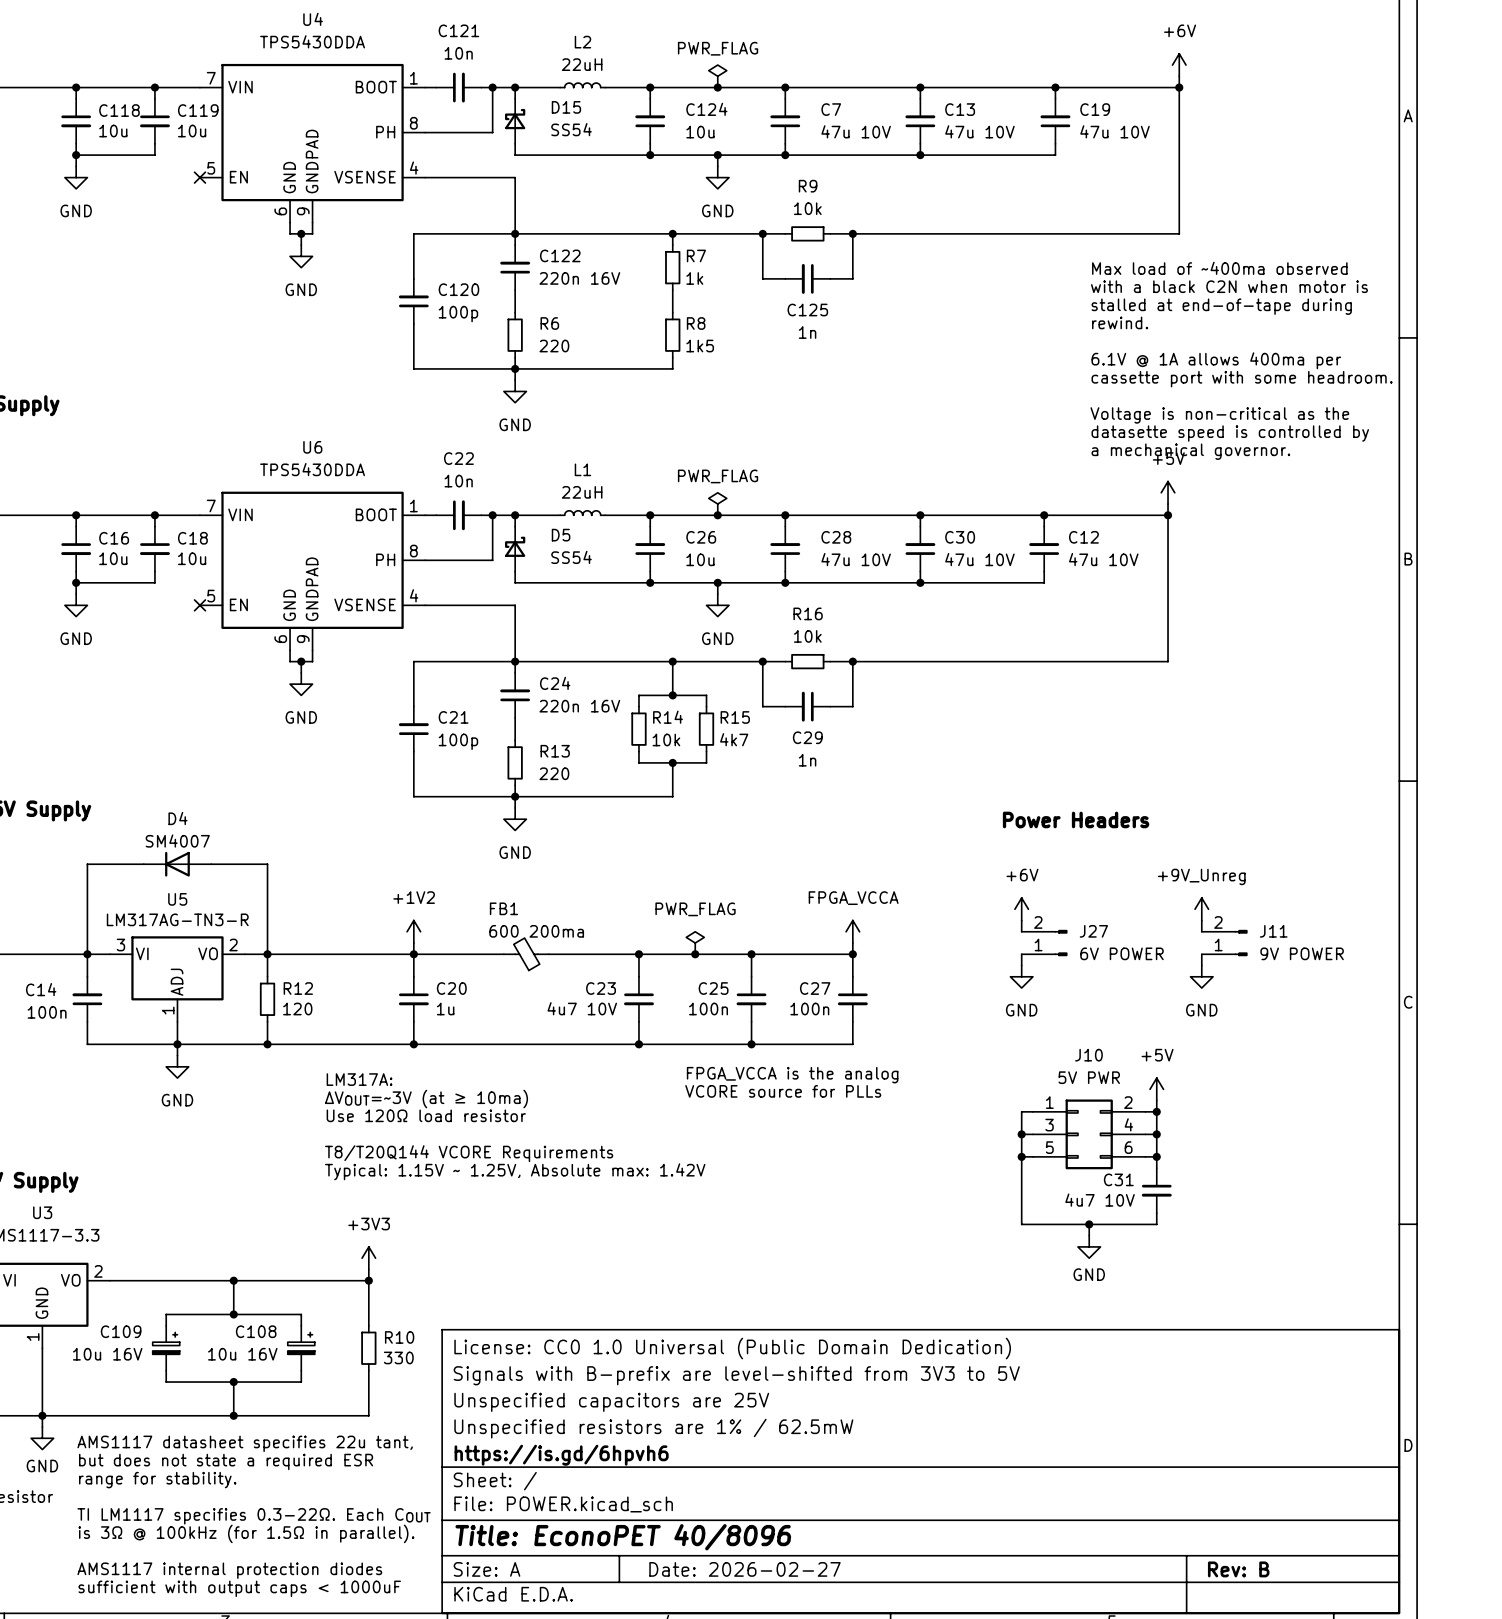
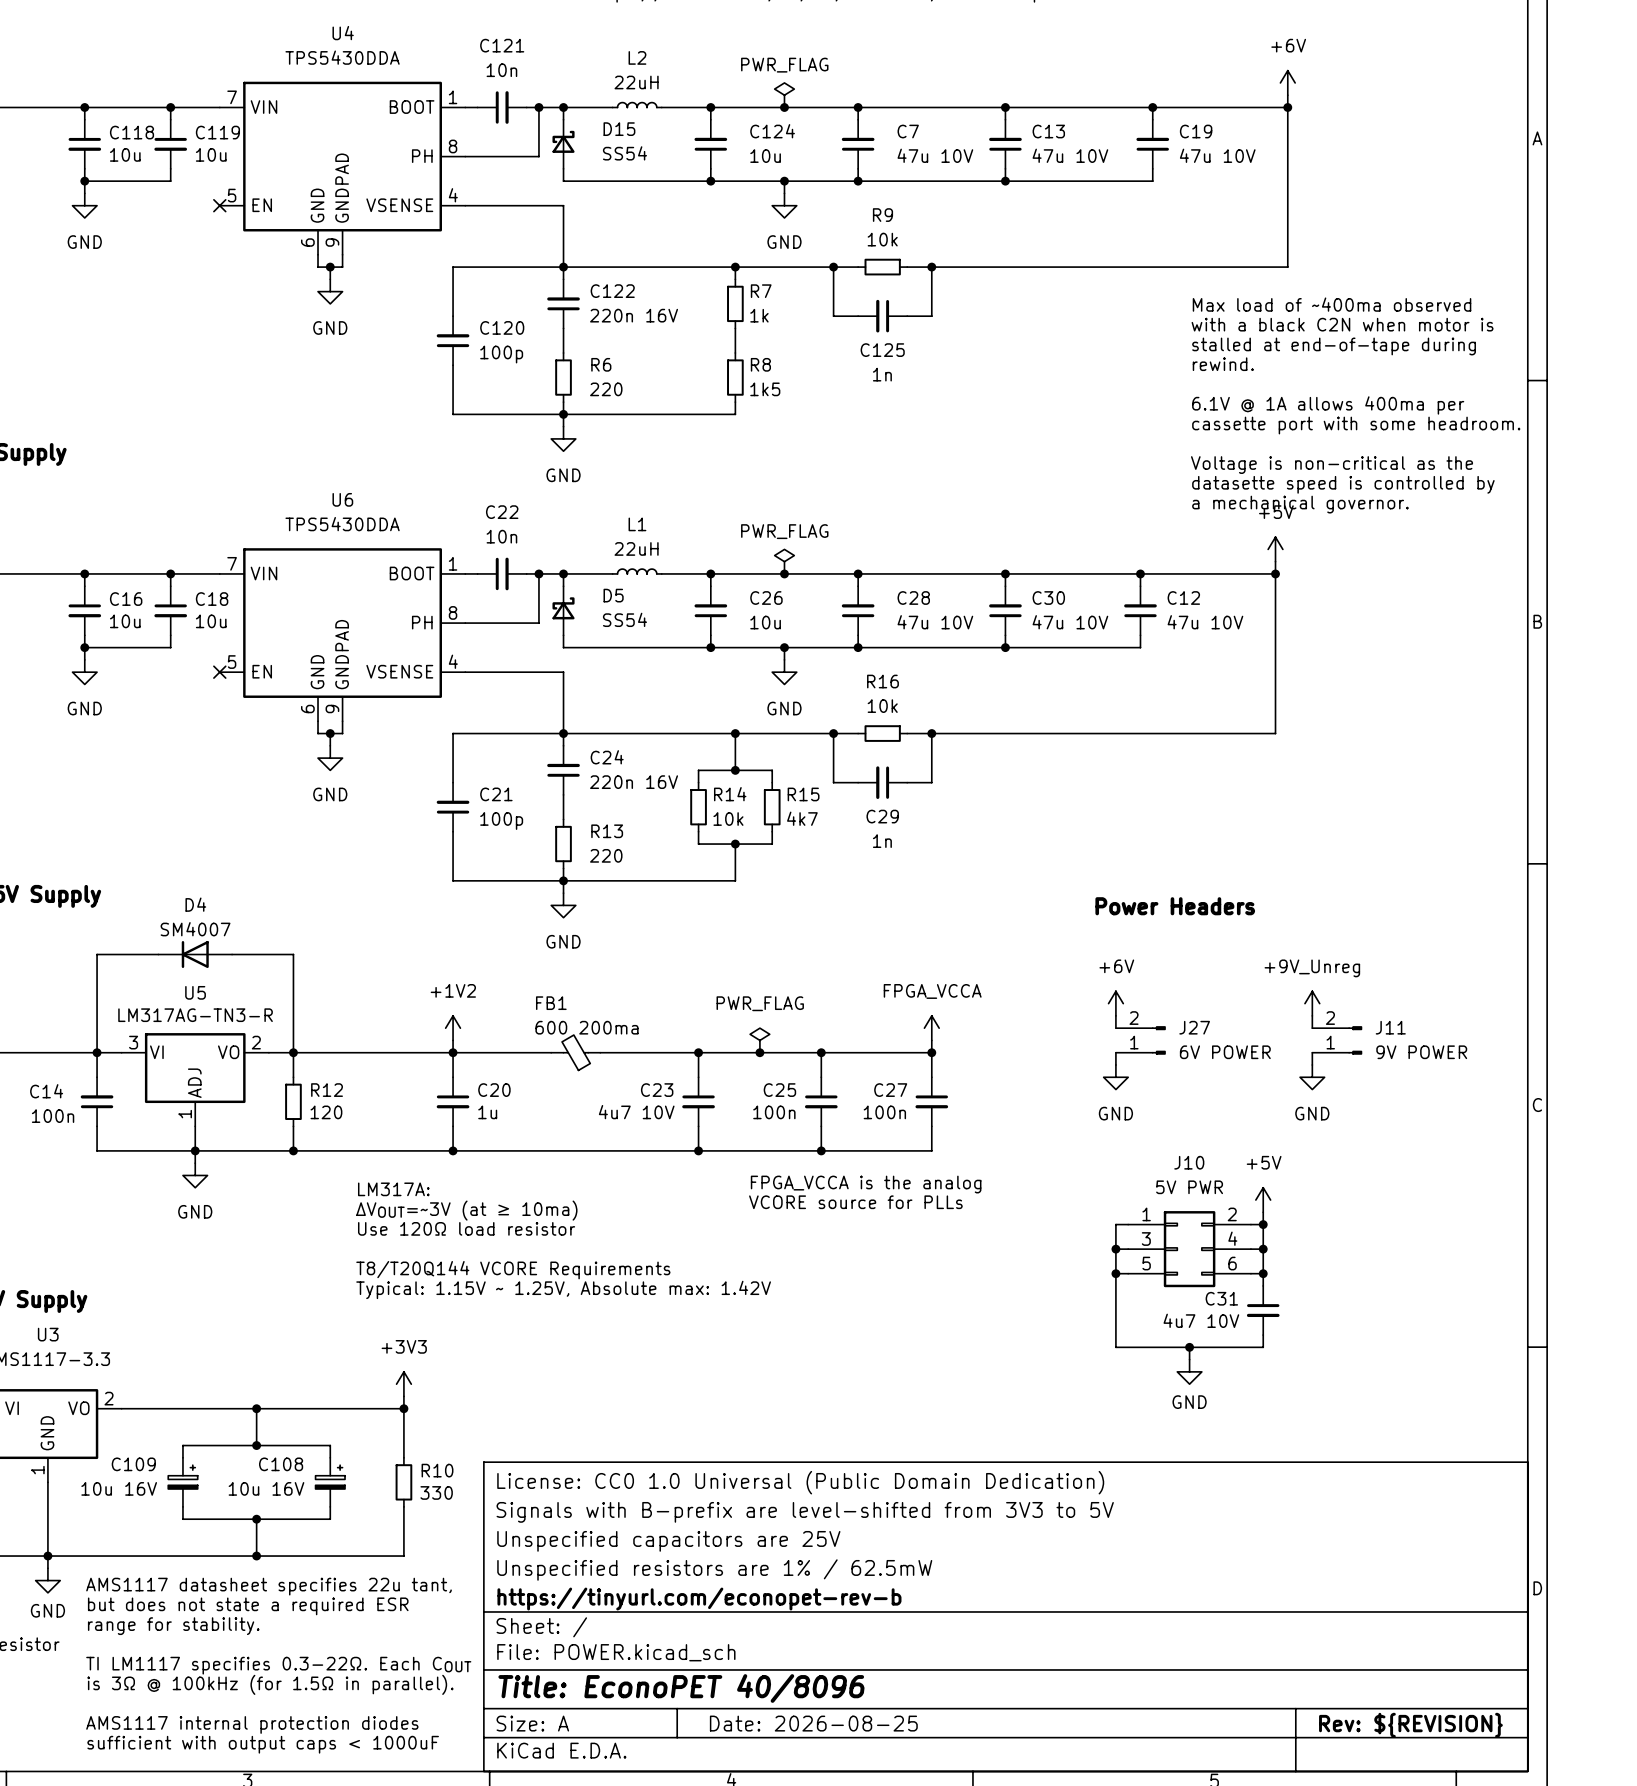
title block: https://is.gd/6hpvh6 (561, 1455) -> https://tinyurl.com/econopet-rev-b (699, 1599)
title block: Date: 2026-02-27 (744, 1569) -> Date: 2026-08-25 (813, 1723)
title block: Rev: B (1238, 1569) -> Rev: ${REVISION} (1410, 1725)

